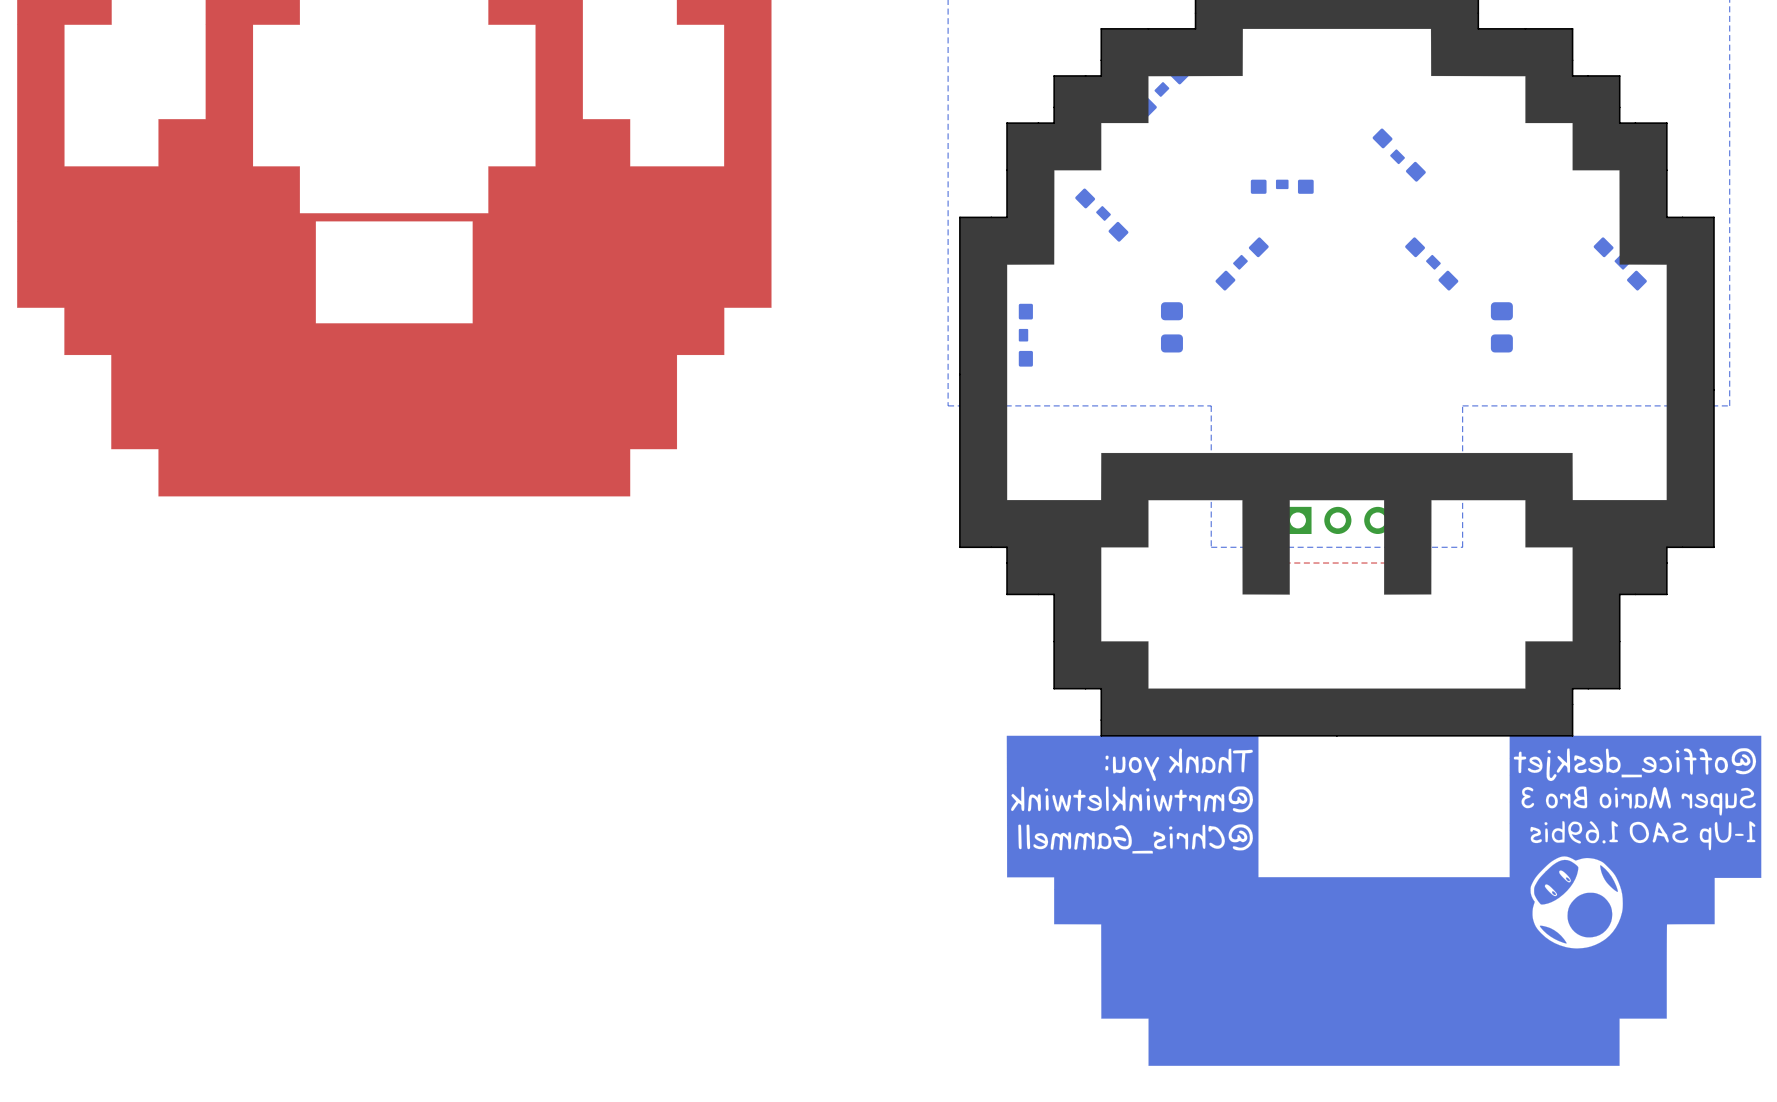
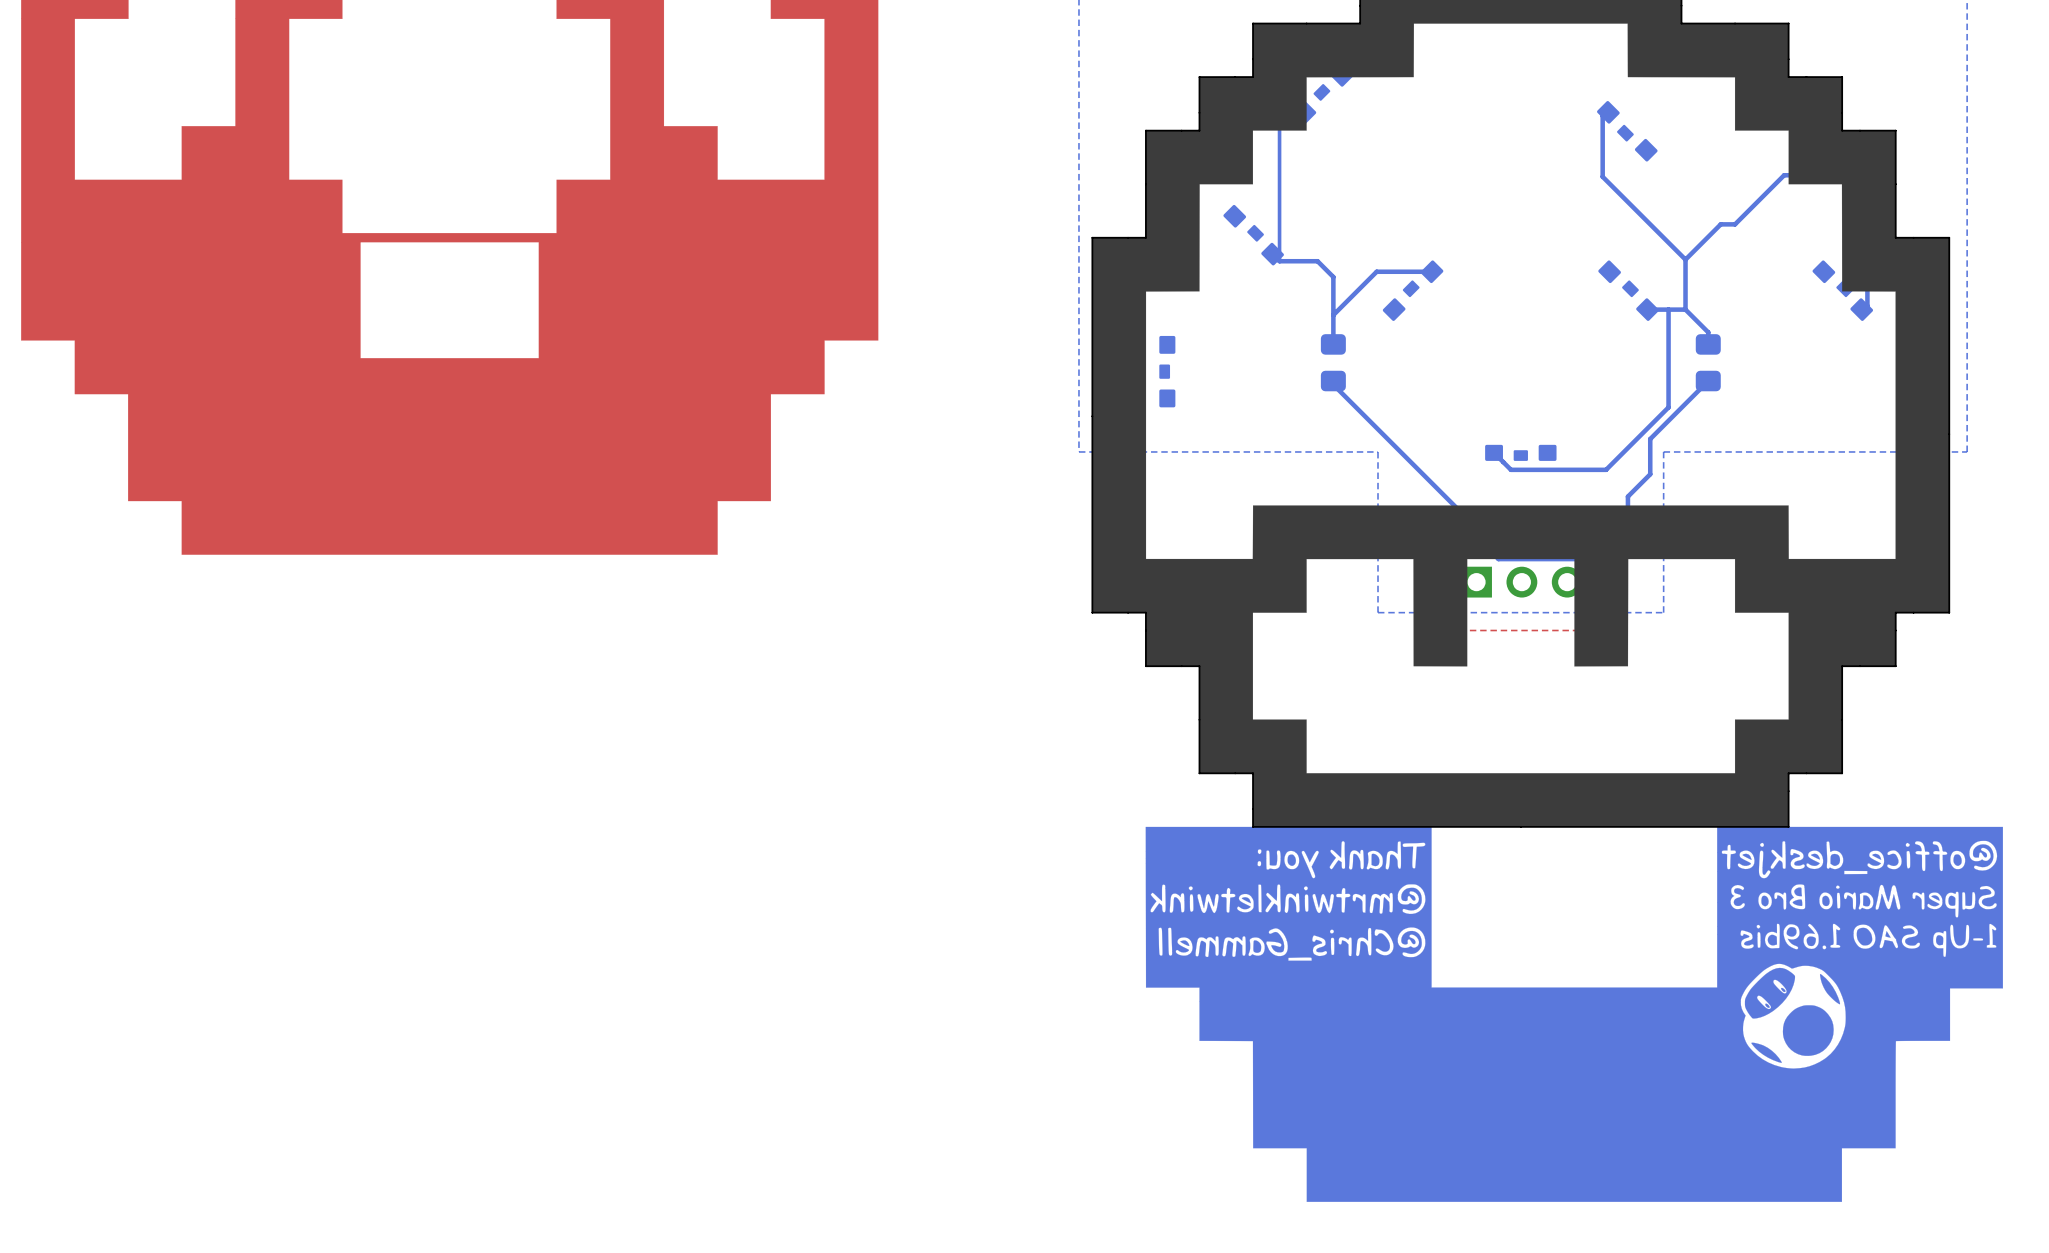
bottom track: none -> (1343, 74) (1338, 70) (1301, 70) (1279, 91) (1279, 261)
bottom track: none -> (1606, 111) (1602, 116) (1602, 176) (1685, 259)
part position: (1399, 155) -> (1627, 131)
part rotation: 0° (1282, 186) -> 180° (1520, 452)
part position: (1282, 186) -> (1520, 452)
bottom track: none -> (1685, 259) (1685, 309)
bottom track: none -> (1685, 259) (1720, 224) (1735, 224) (1784, 175) (1851, 175) (1867, 191) (1867, 305) (1863, 310)
bottom track: none -> (1279, 261) (1317, 261) (1333, 277) (1333, 344)
bottom track: none -> (1432, 271) (1376, 271) (1333, 315)
bottom track: none -> (1647, 309) (1685, 309)
bottom track: none -> (1668, 309) (1668, 407) (1606, 469) (1511, 469) (1494, 452)
bottom track: none -> (1685, 309) (1708, 332) (1708, 344)
bottom track: none -> (1333, 381) (1333, 384) (1476, 527) (1476, 536) (1494, 554)
bottom track: none -> (1708, 381) (1650, 439) (1650, 474) (1627, 496) (1627, 550) (1619, 559) (1498, 559) (1494, 554)

